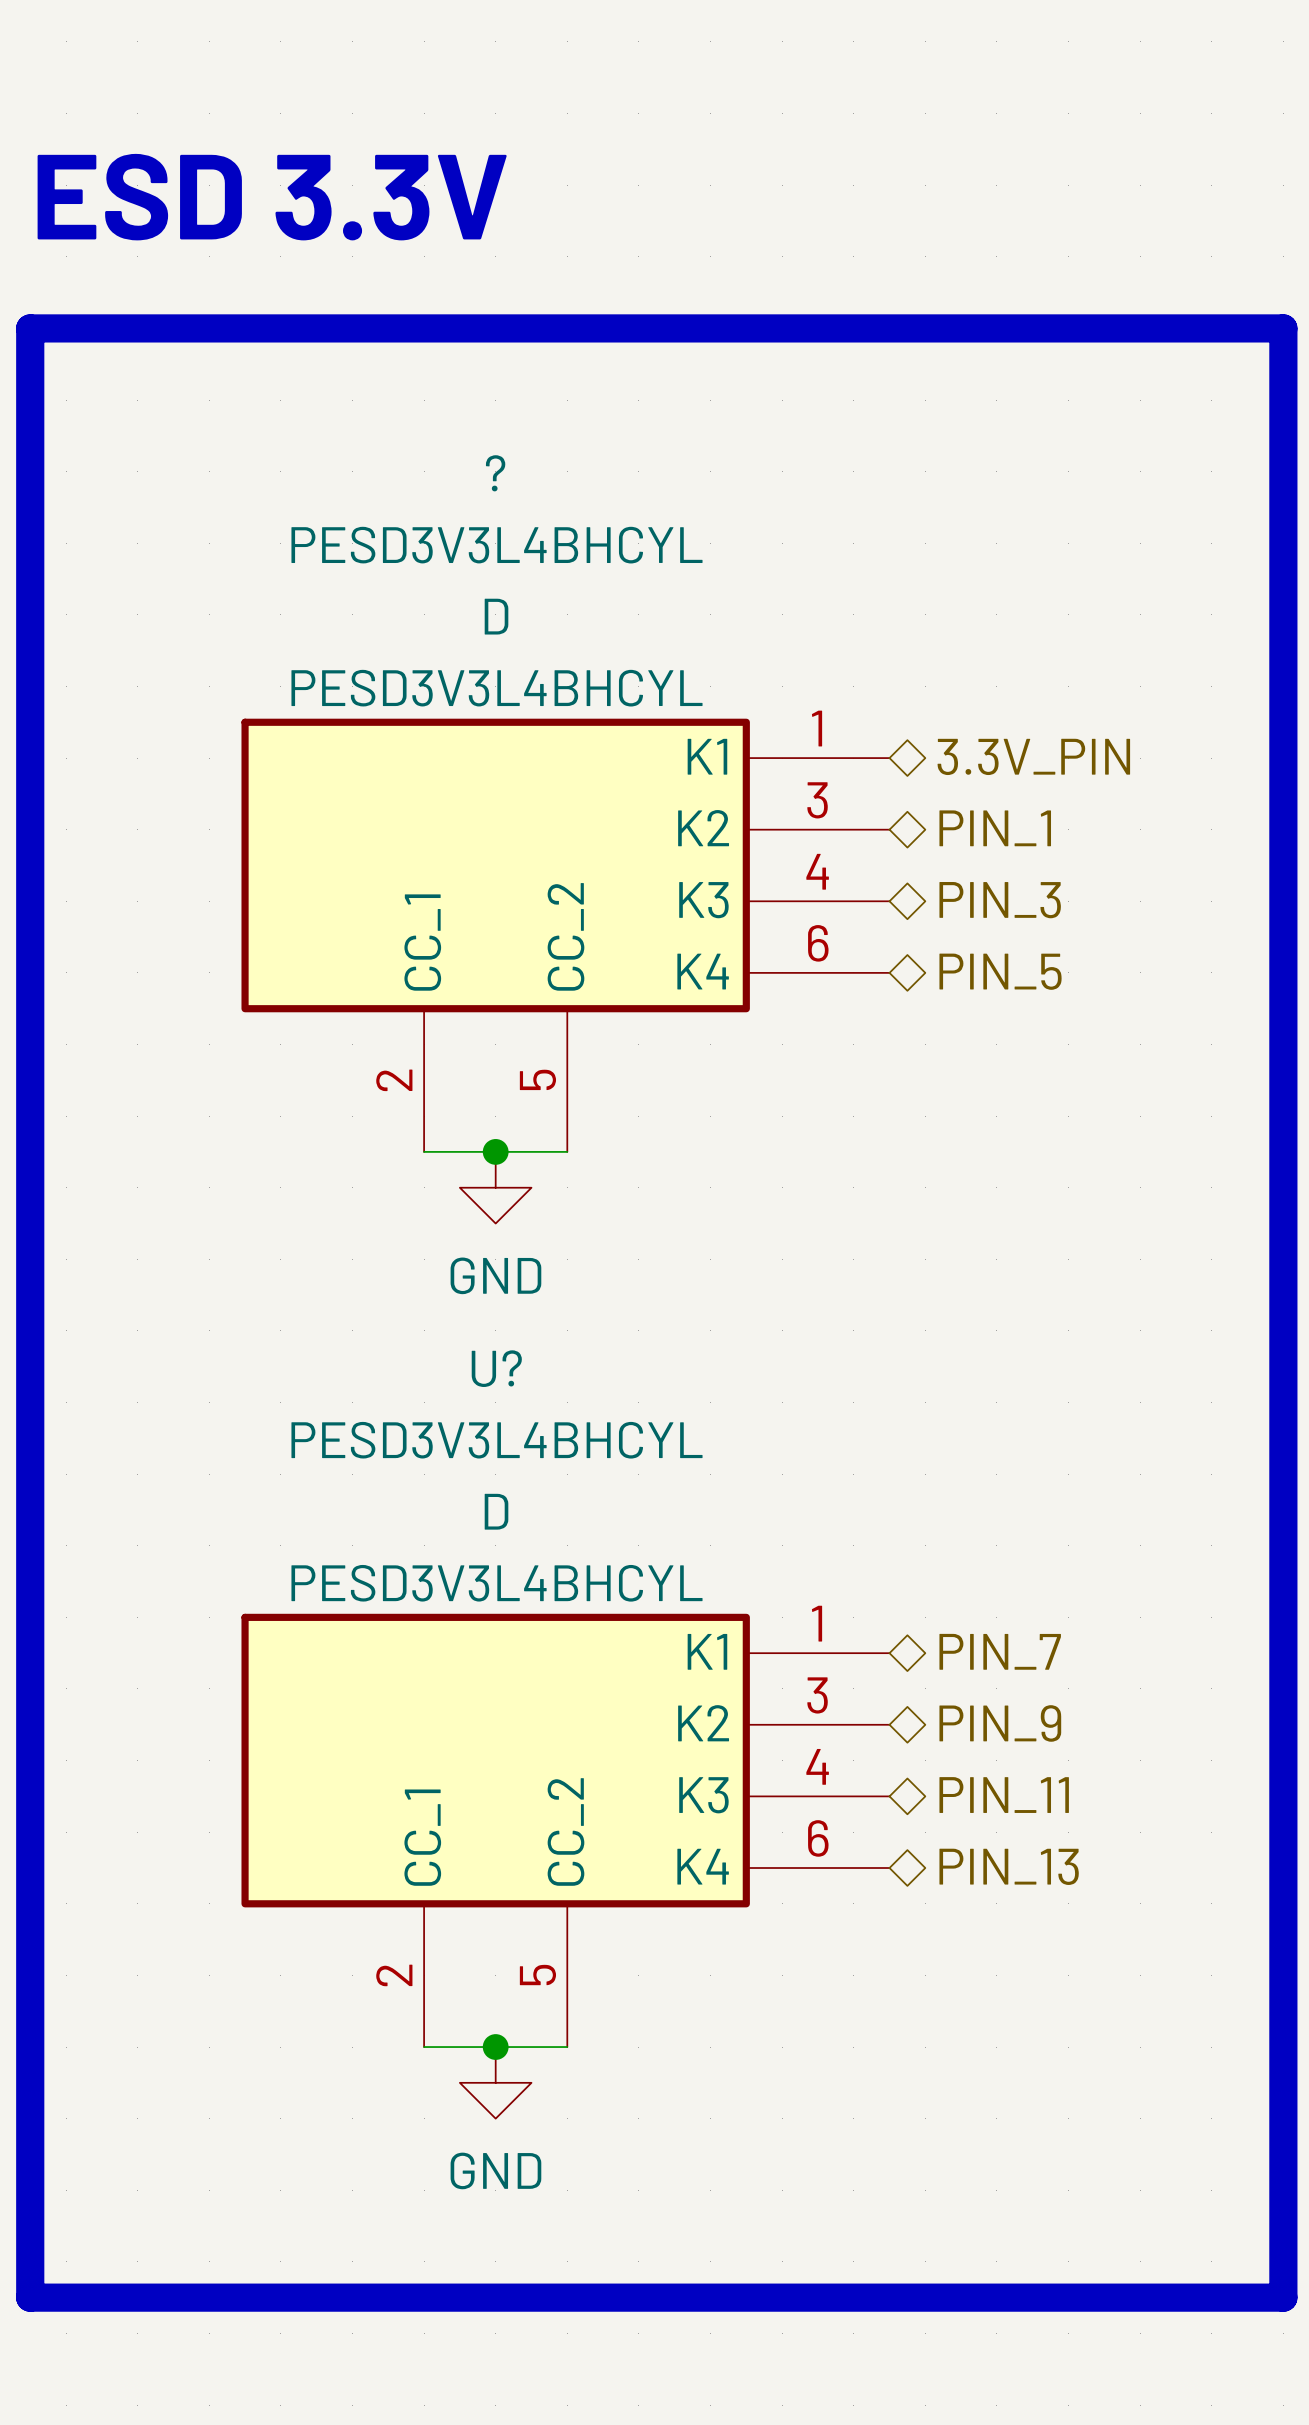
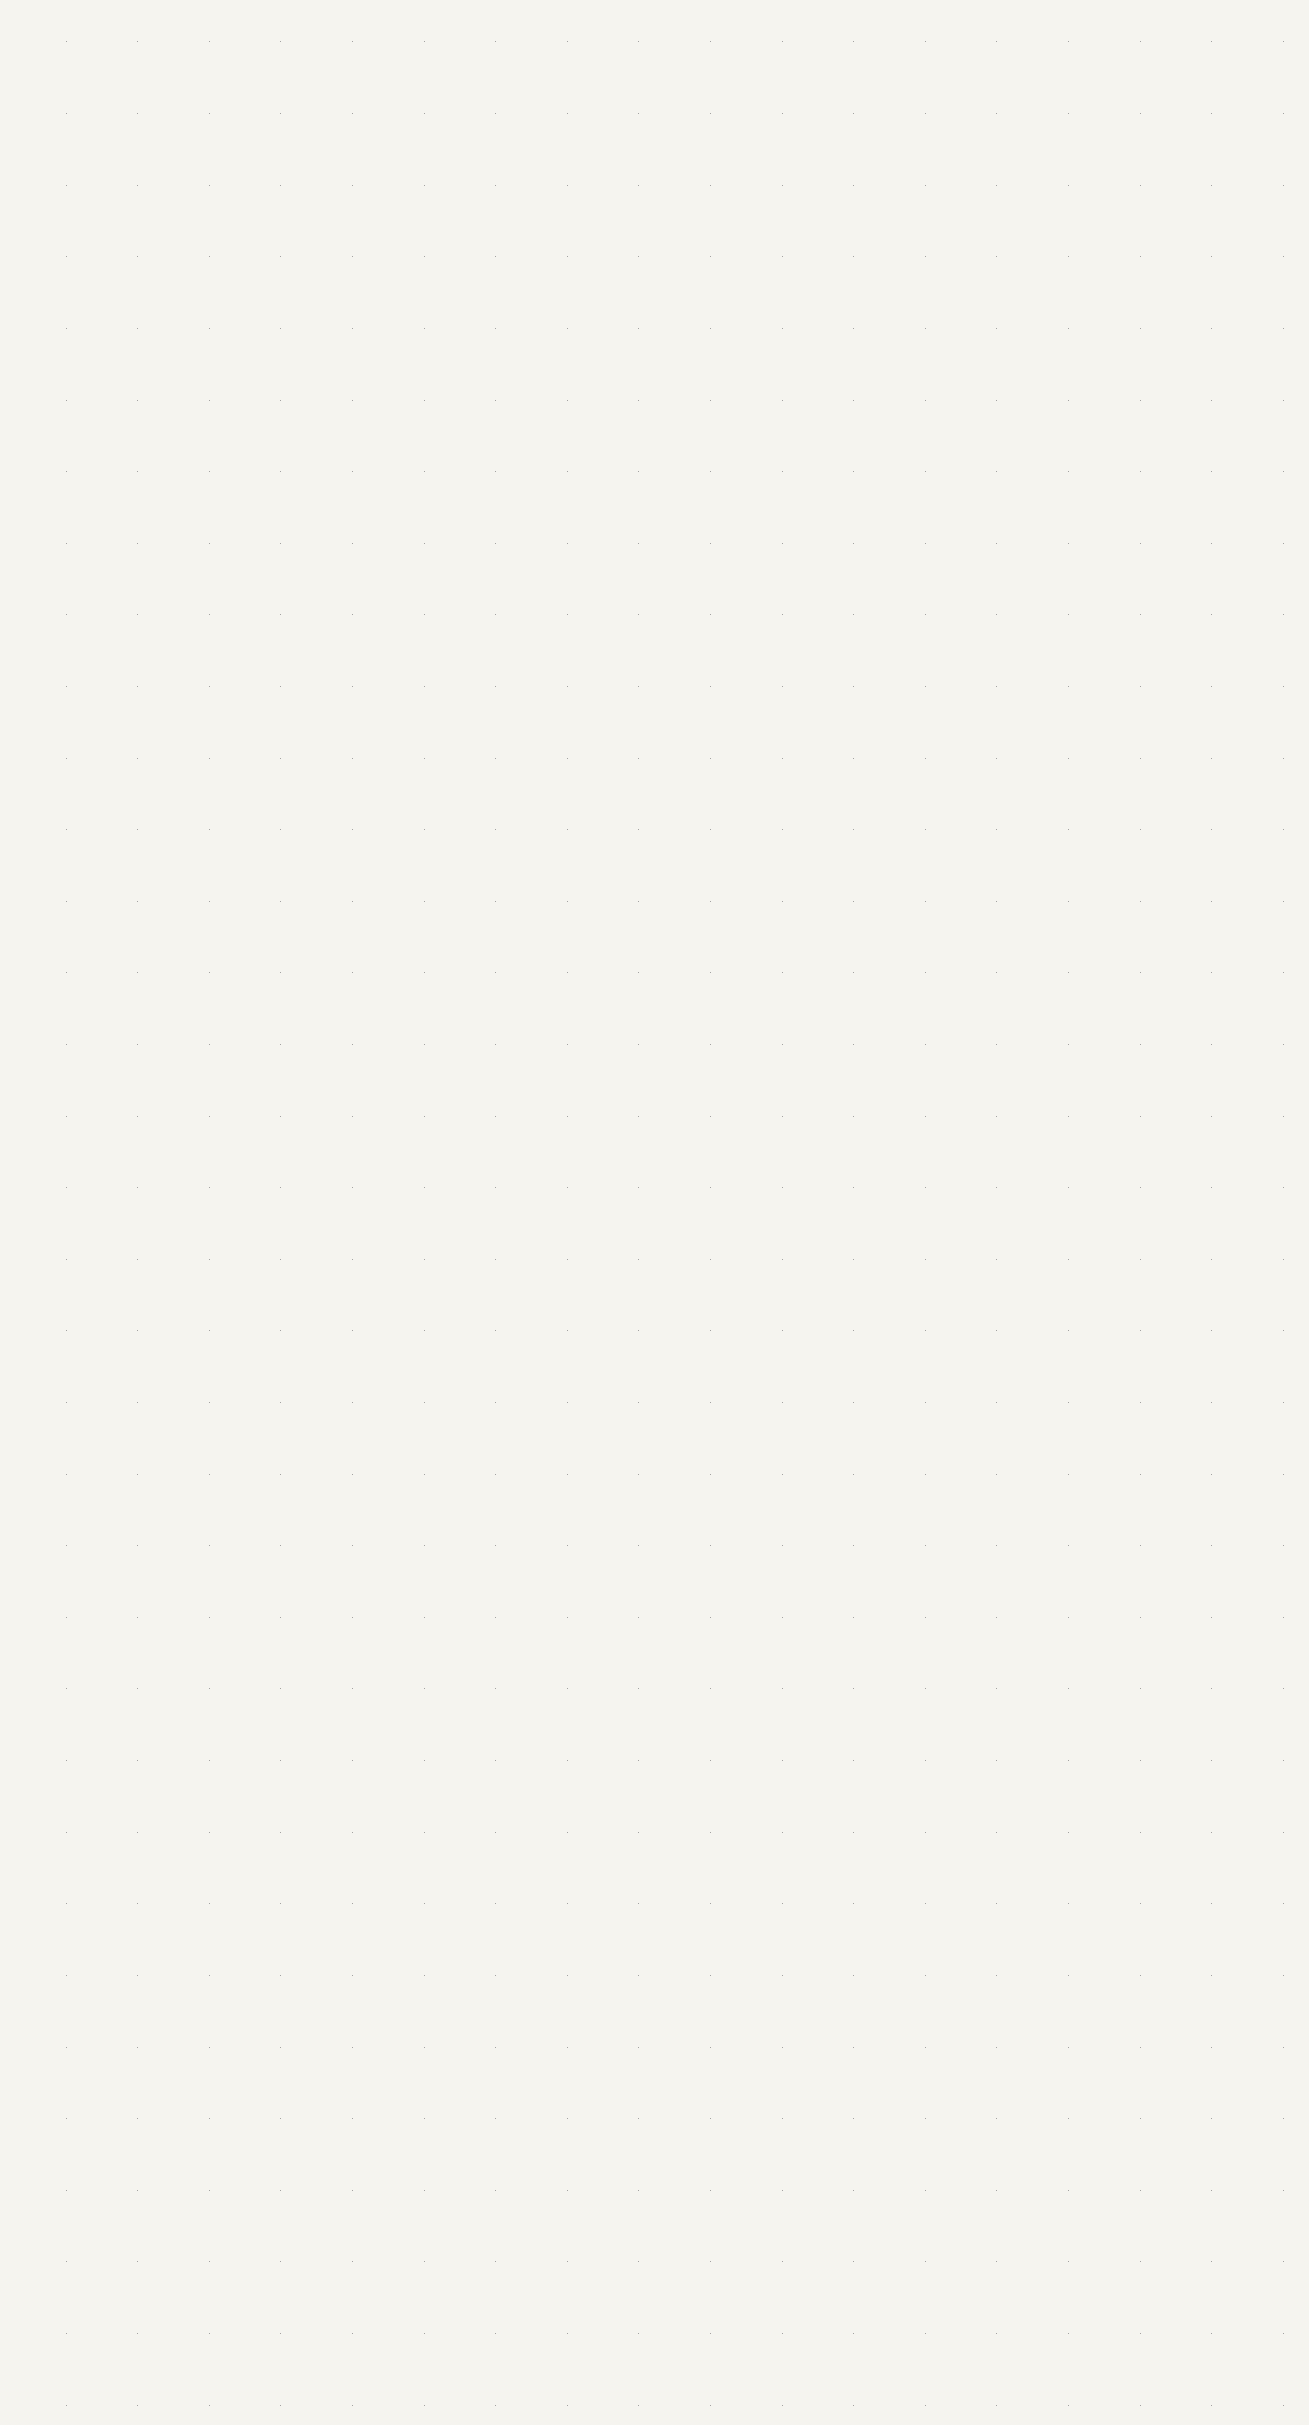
text: ESD 3.3V (272, 197) -> none
line: (30, 328) (1283, 328) (1283, 2297) (30, 2297) (30, 328) -> none
hierarchical label: 3.3V_PIN (1033, 756) -> none
hierarchical label: PIN_1 (995, 828) -> none
hierarchical label: PIN_3 (1000, 900) -> none
part: PESD3V3L4BHCYL (565, 935) -> none
hierarchical label: PIN_5 (1000, 971) -> none
wire: (424, 1151) (567, 1151) -> none
junction: (495, 1151) -> none
power symbol: GND (495, 1187) -> none
hierarchical label: PIN_7 (1000, 1651) -> none
hierarchical label: PIN_9 (1000, 1723) -> none
hierarchical label: PIN_11 (1004, 1795) -> none
U?: PESD3V3L4BHCYL (565, 1830) -> none
hierarchical label: PIN_13 (1009, 1866) -> none
wire: (424, 2047) (567, 2047) -> none
junction: (495, 2047) -> none
power symbol: GND (495, 2082) -> none

